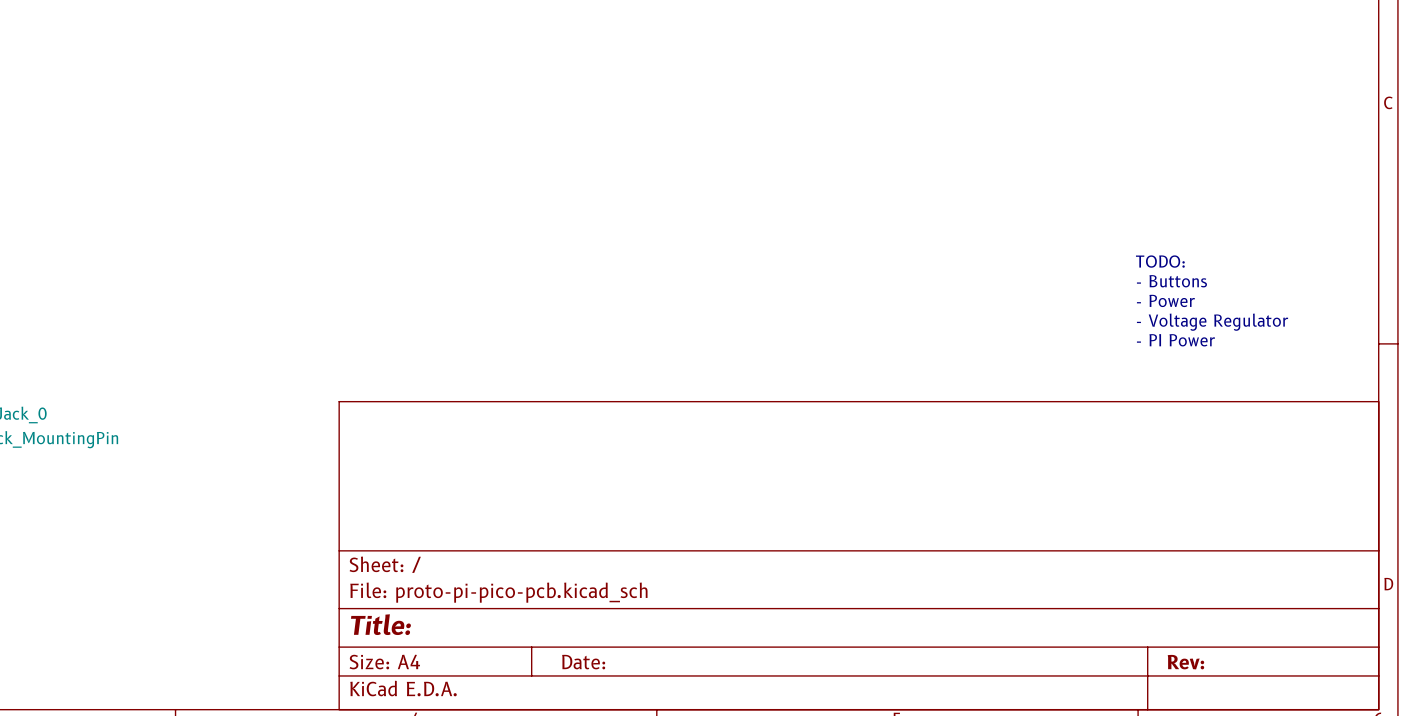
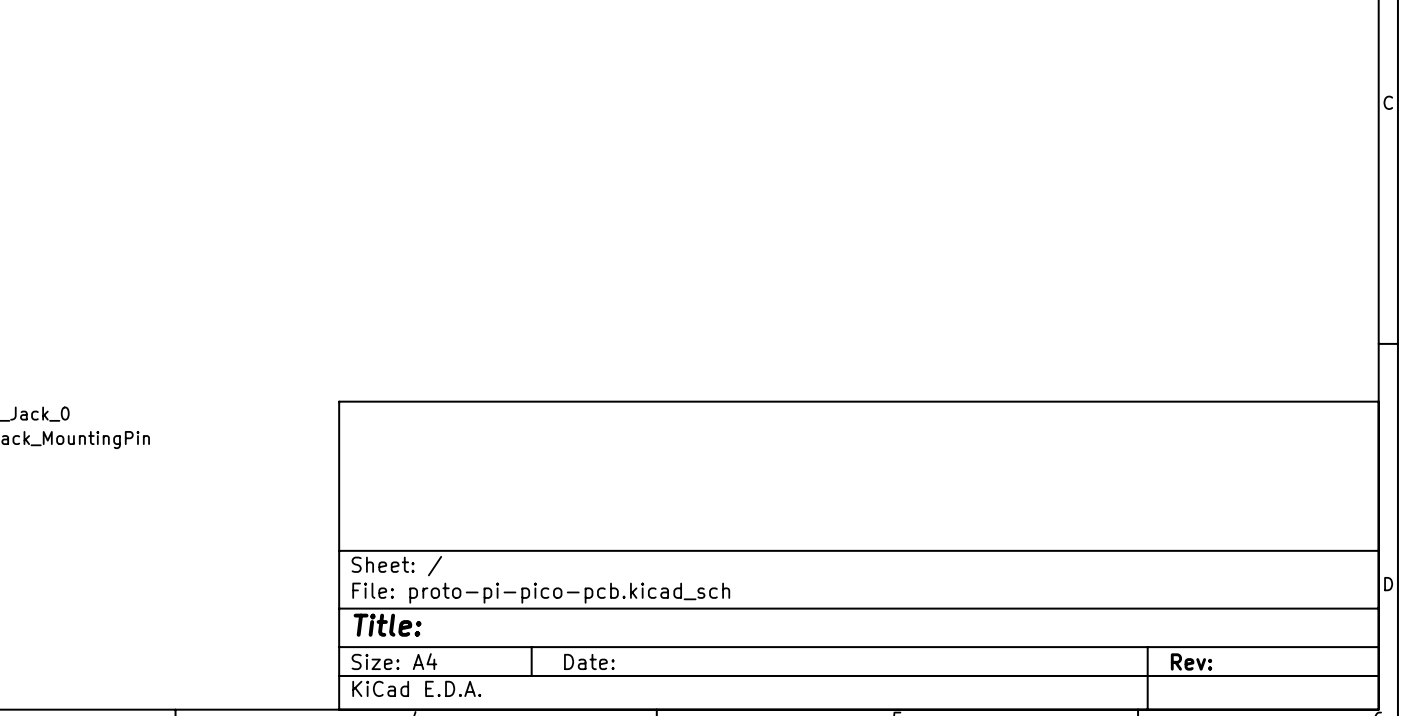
text: TODO: (1160, 261) -> none
text: - Buttons (1171, 281) -> none
text: - Power (1165, 300) -> none
text: - Voltage Regulator (1212, 322) -> none
text: - PI Power (1175, 340) -> none

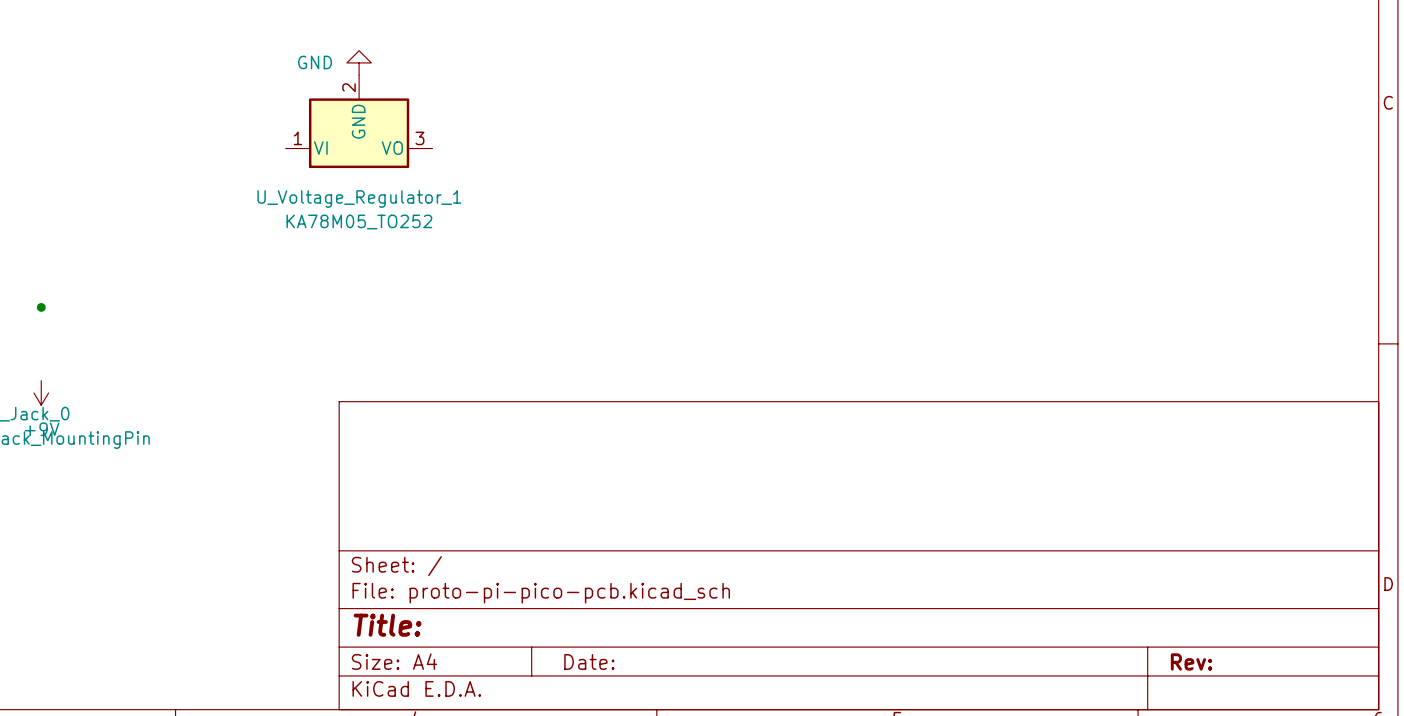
power symbol: none -> GND (359, 62)
U_Voltage_Regulator_1: none -> KA78M05_TO252 (359, 121)
junction: none -> (41, 307)
power symbol: none -> +9V (41, 392)

